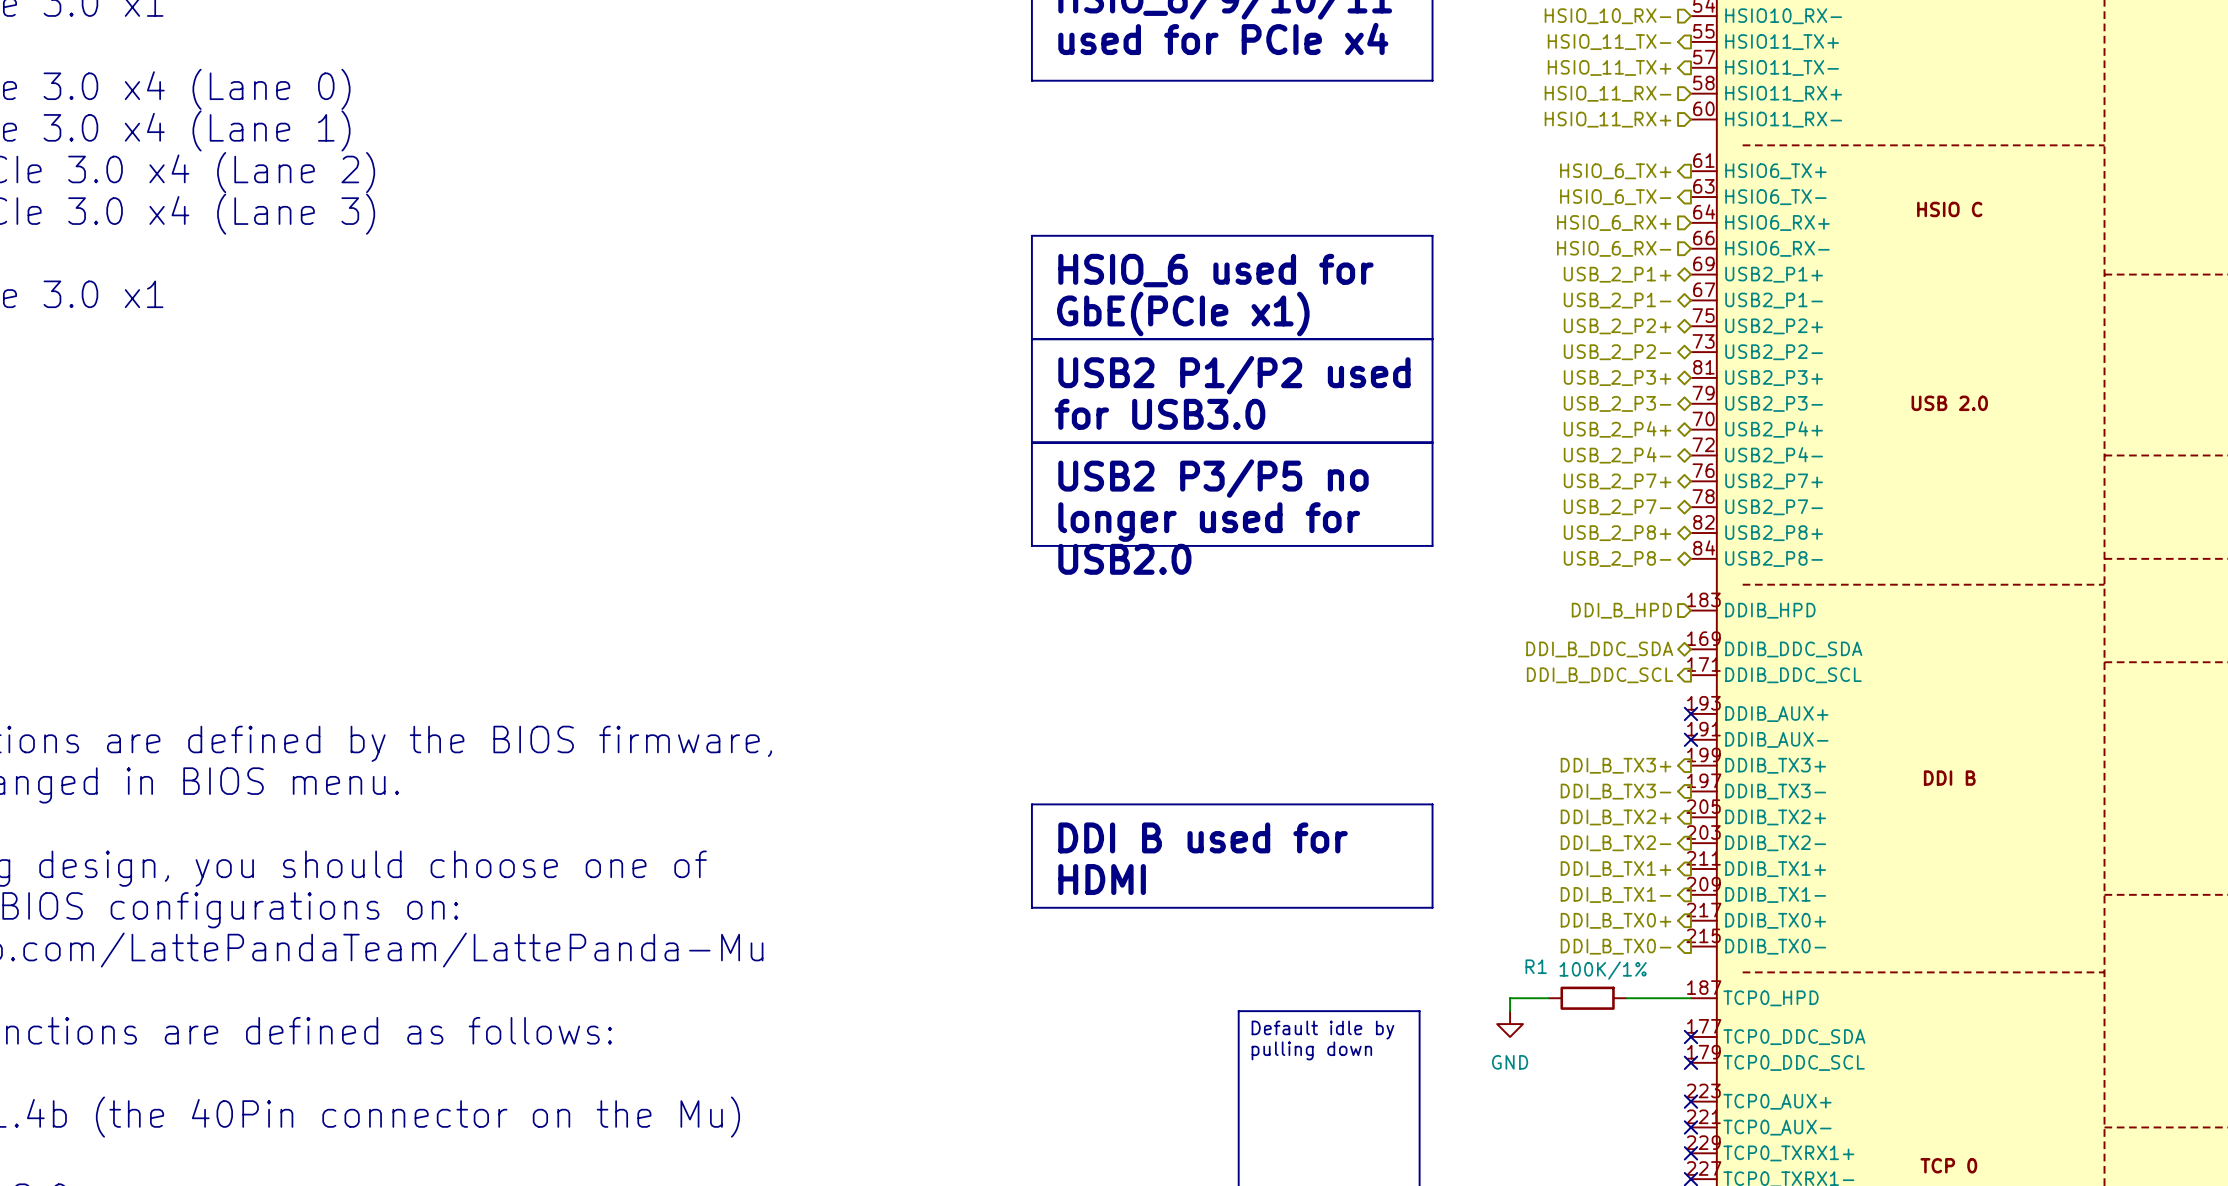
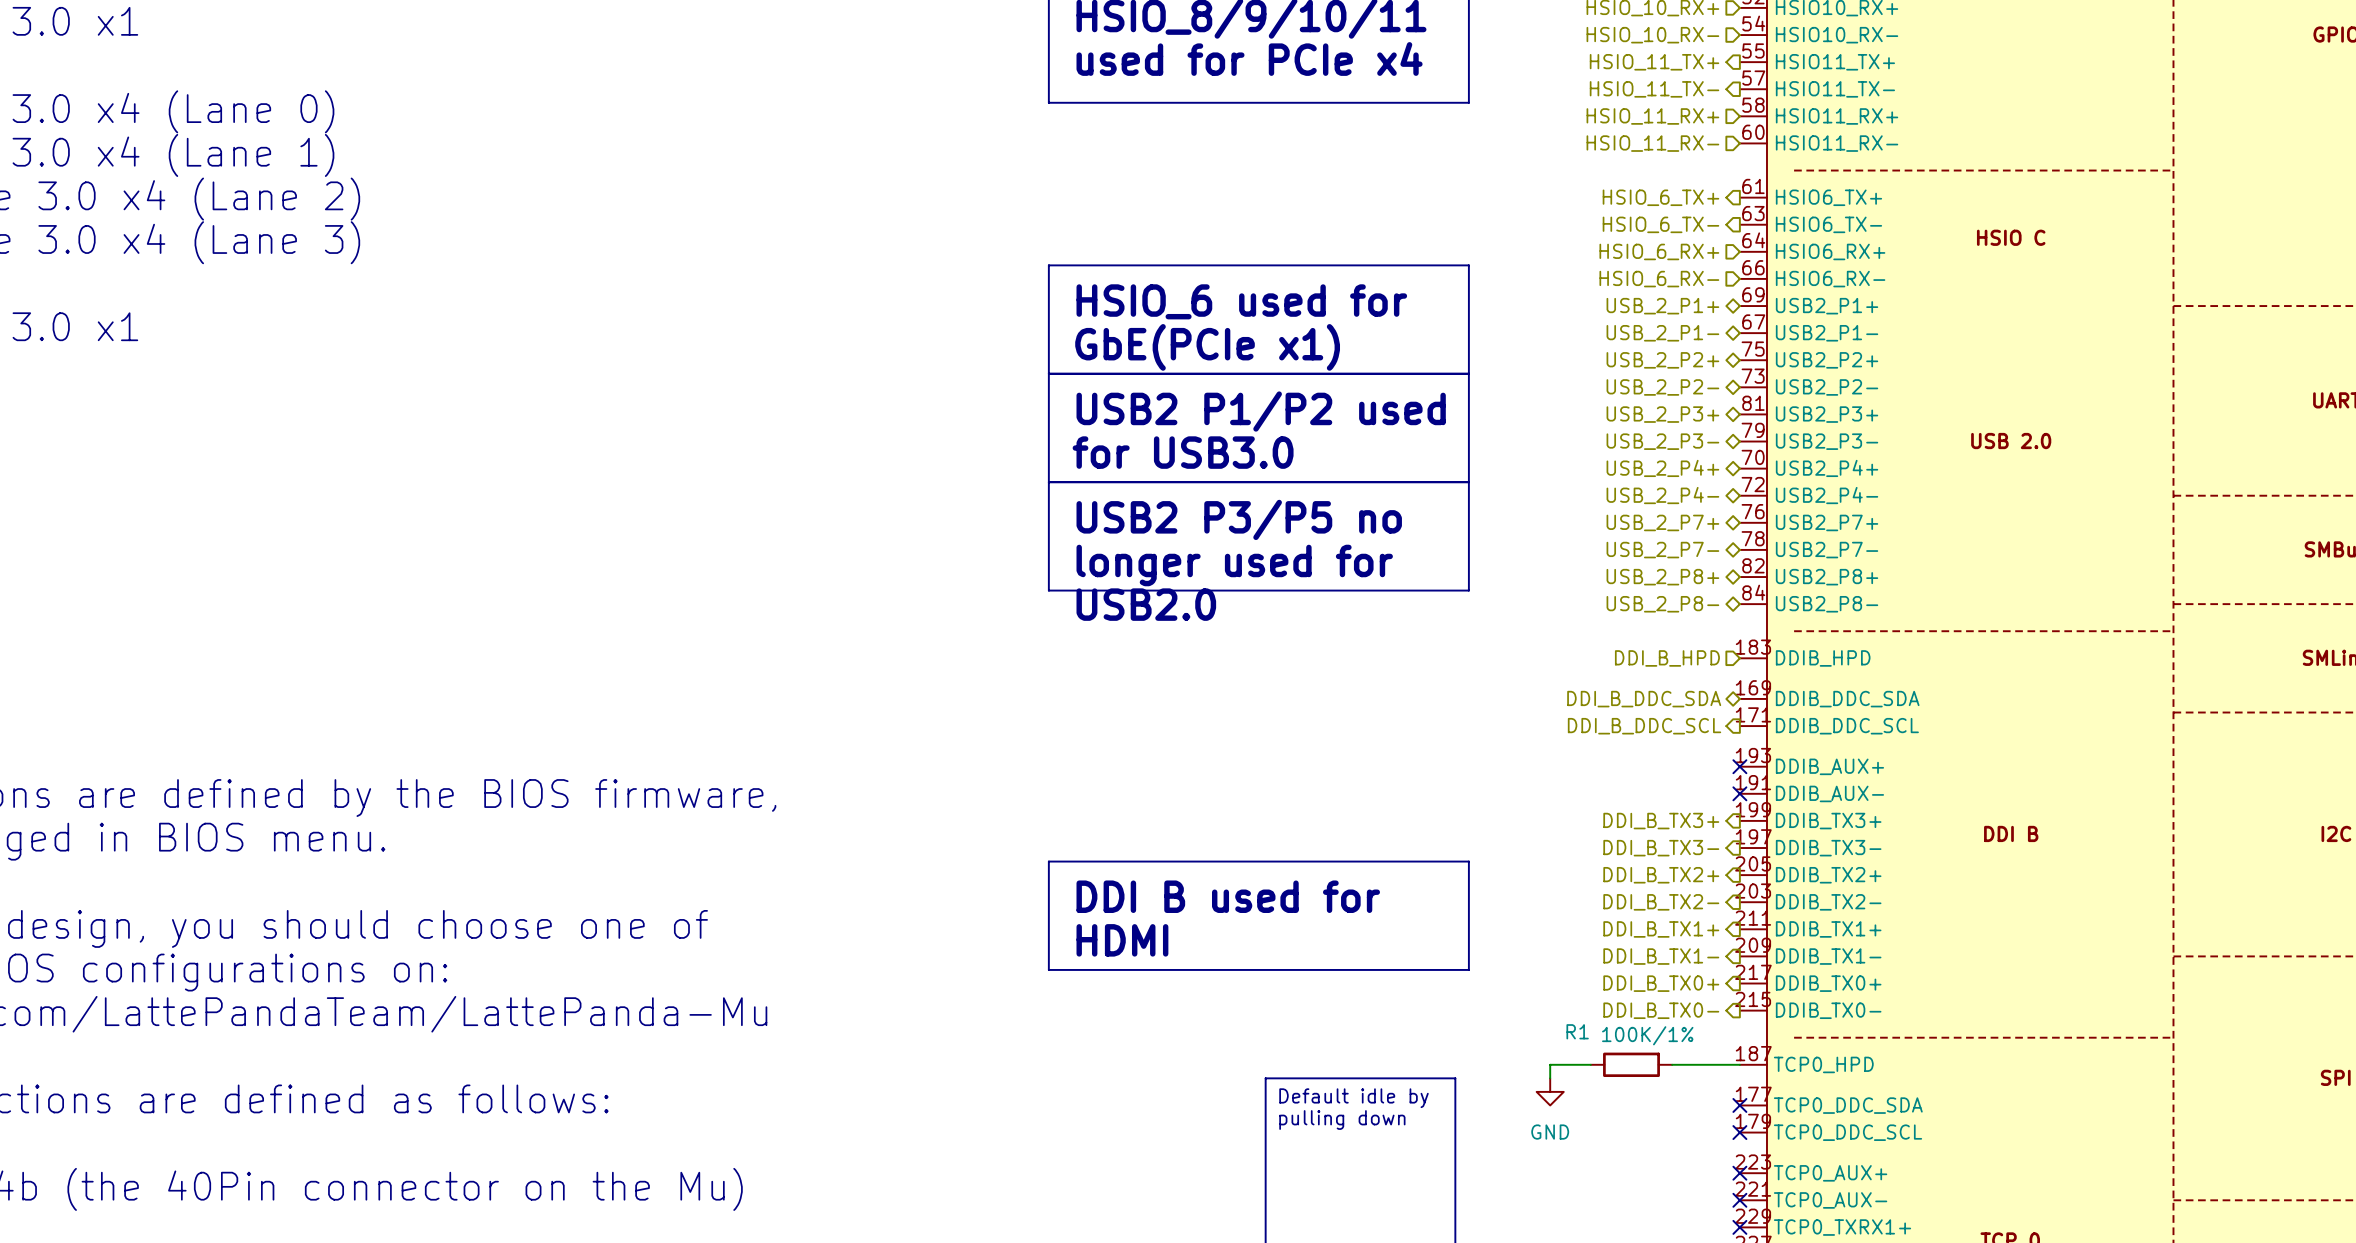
hierarchical label: HSIO_11_TX- (1609, 42) -> HSIO_11_TX+ (1654, 62)
hierarchical label: HSIO_11_TX+ (1609, 67) -> HSIO_11_TX- (1654, 89)
hierarchical label: HSIO_11_RX- (1608, 93) -> HSIO_11_RX+ (1652, 116)
hierarchical label: HSIO_11_RX+ (1608, 119) -> HSIO_11_RX- (1652, 143)

